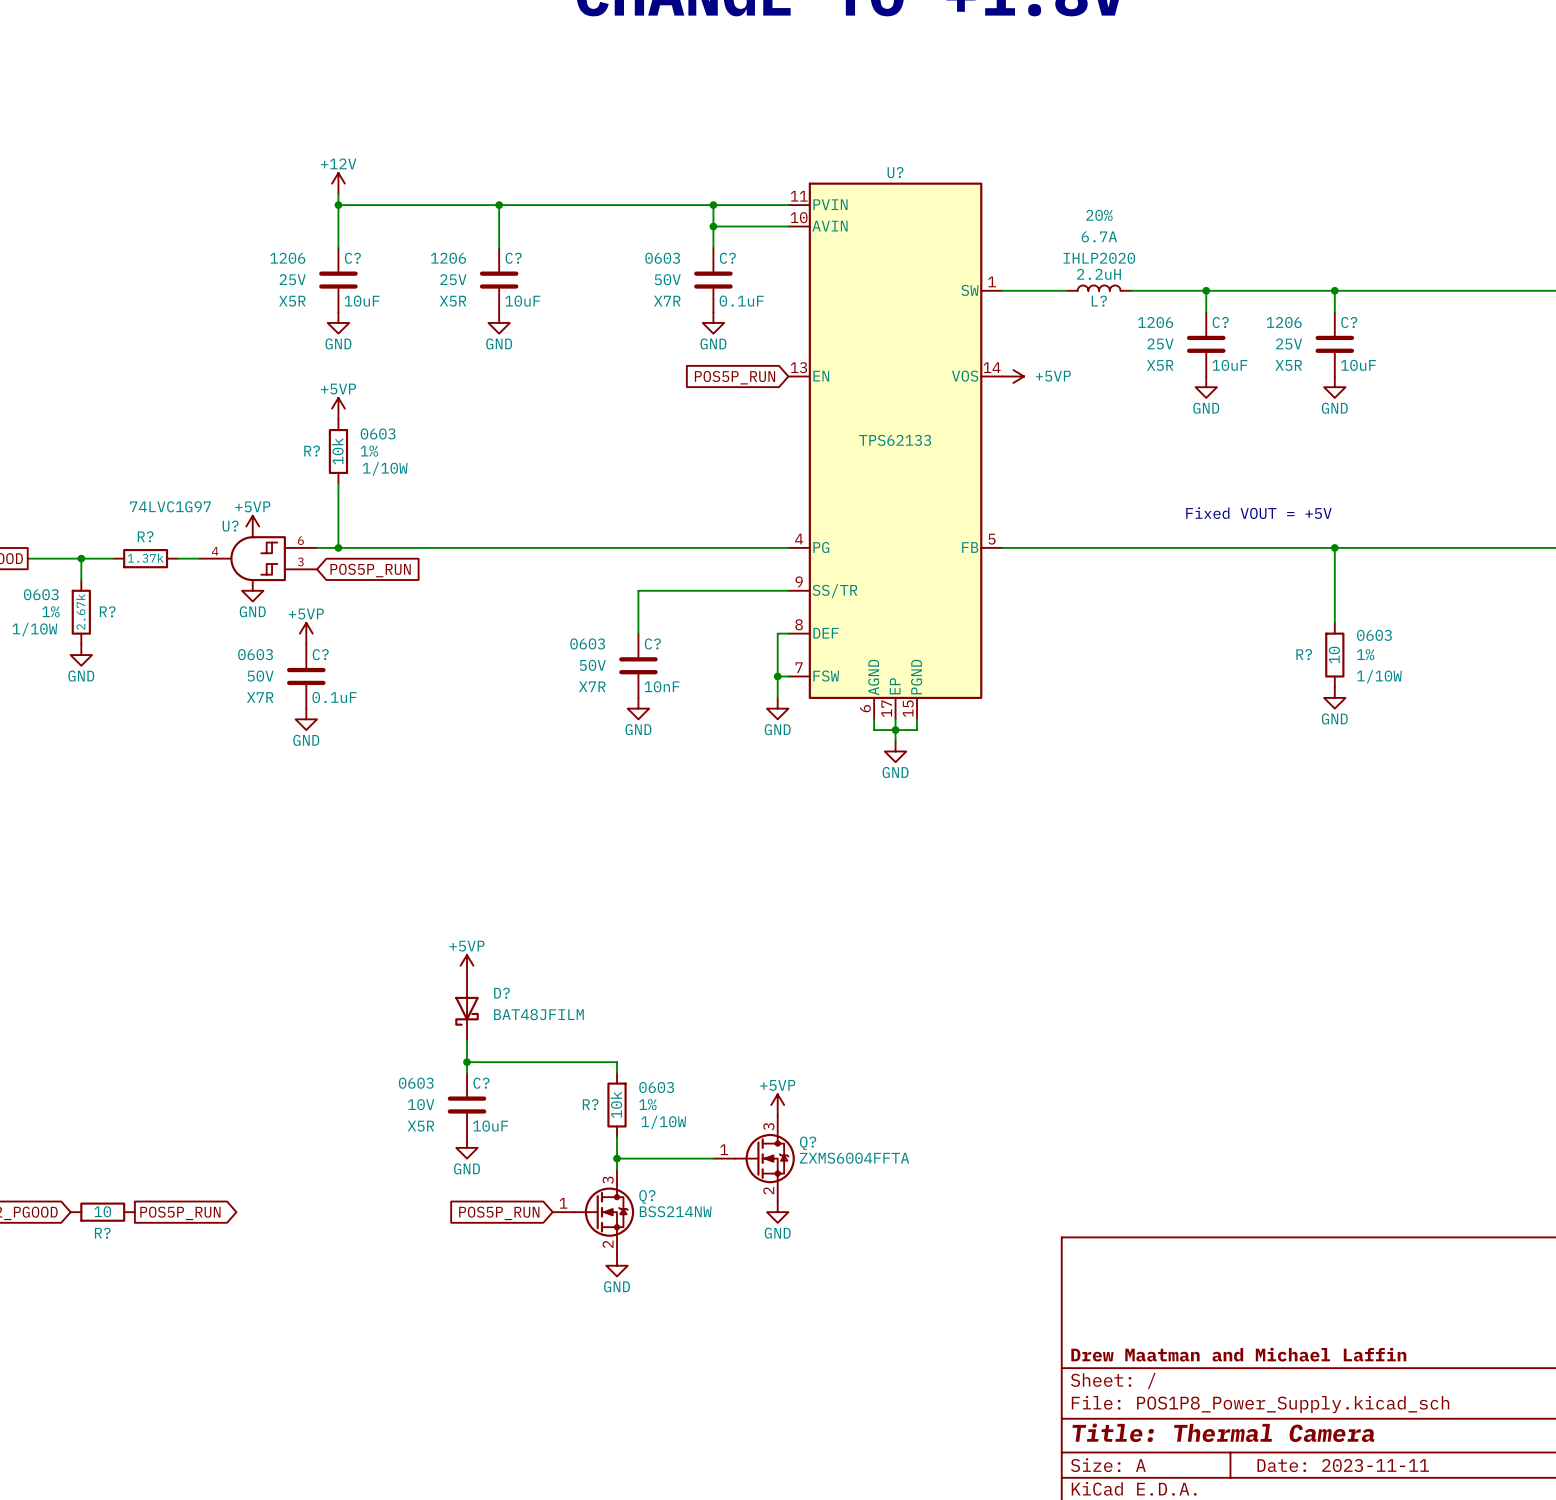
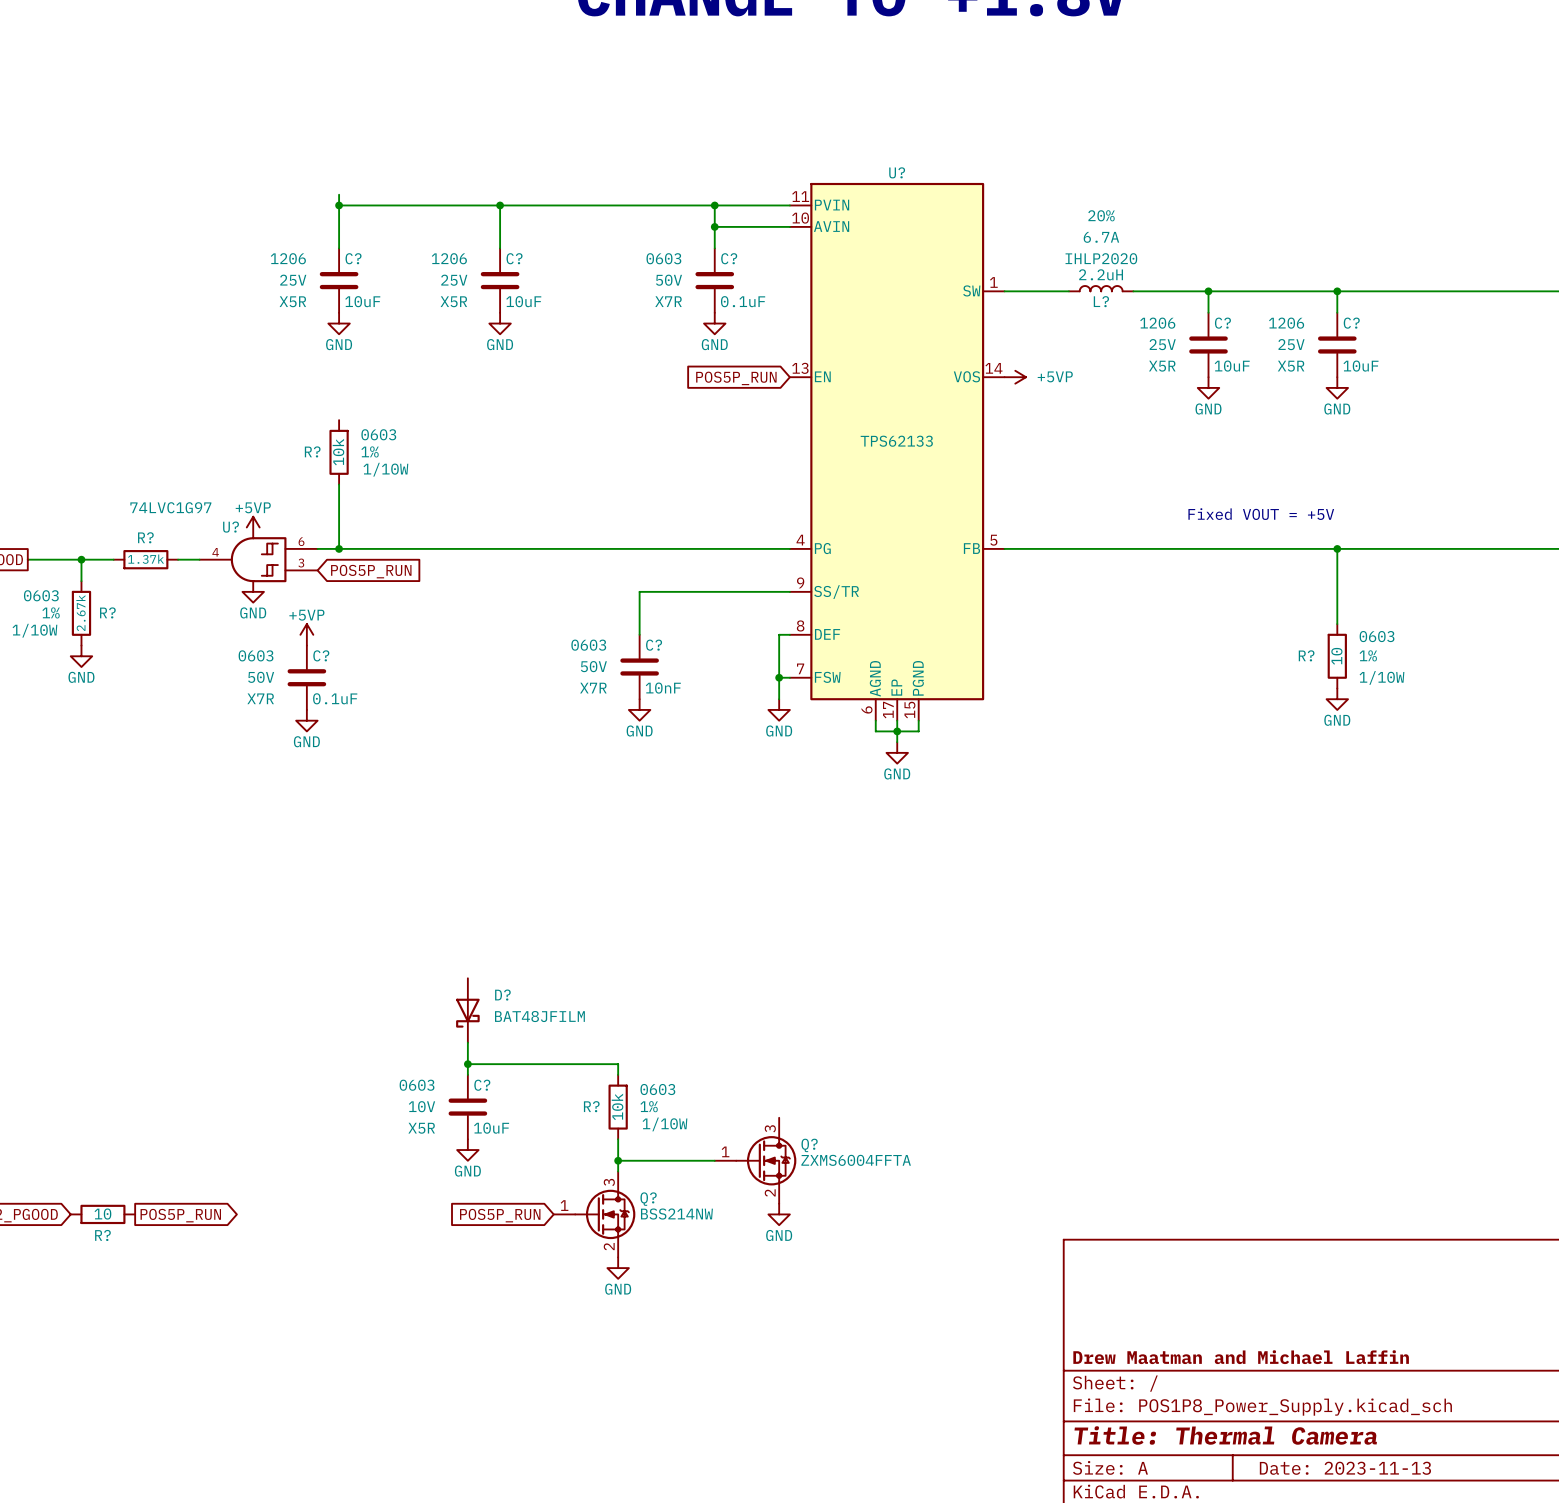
power symbol: +12V (338, 183) -> none
power symbol: +5VP (338, 408) -> none
power symbol: +5VP (467, 965) -> none
power symbol: +5VP (777, 1105) -> none
title block: Date: 2023-11-11 (1343, 1465) -> Date: 2023-11-13 (1345, 1468)

